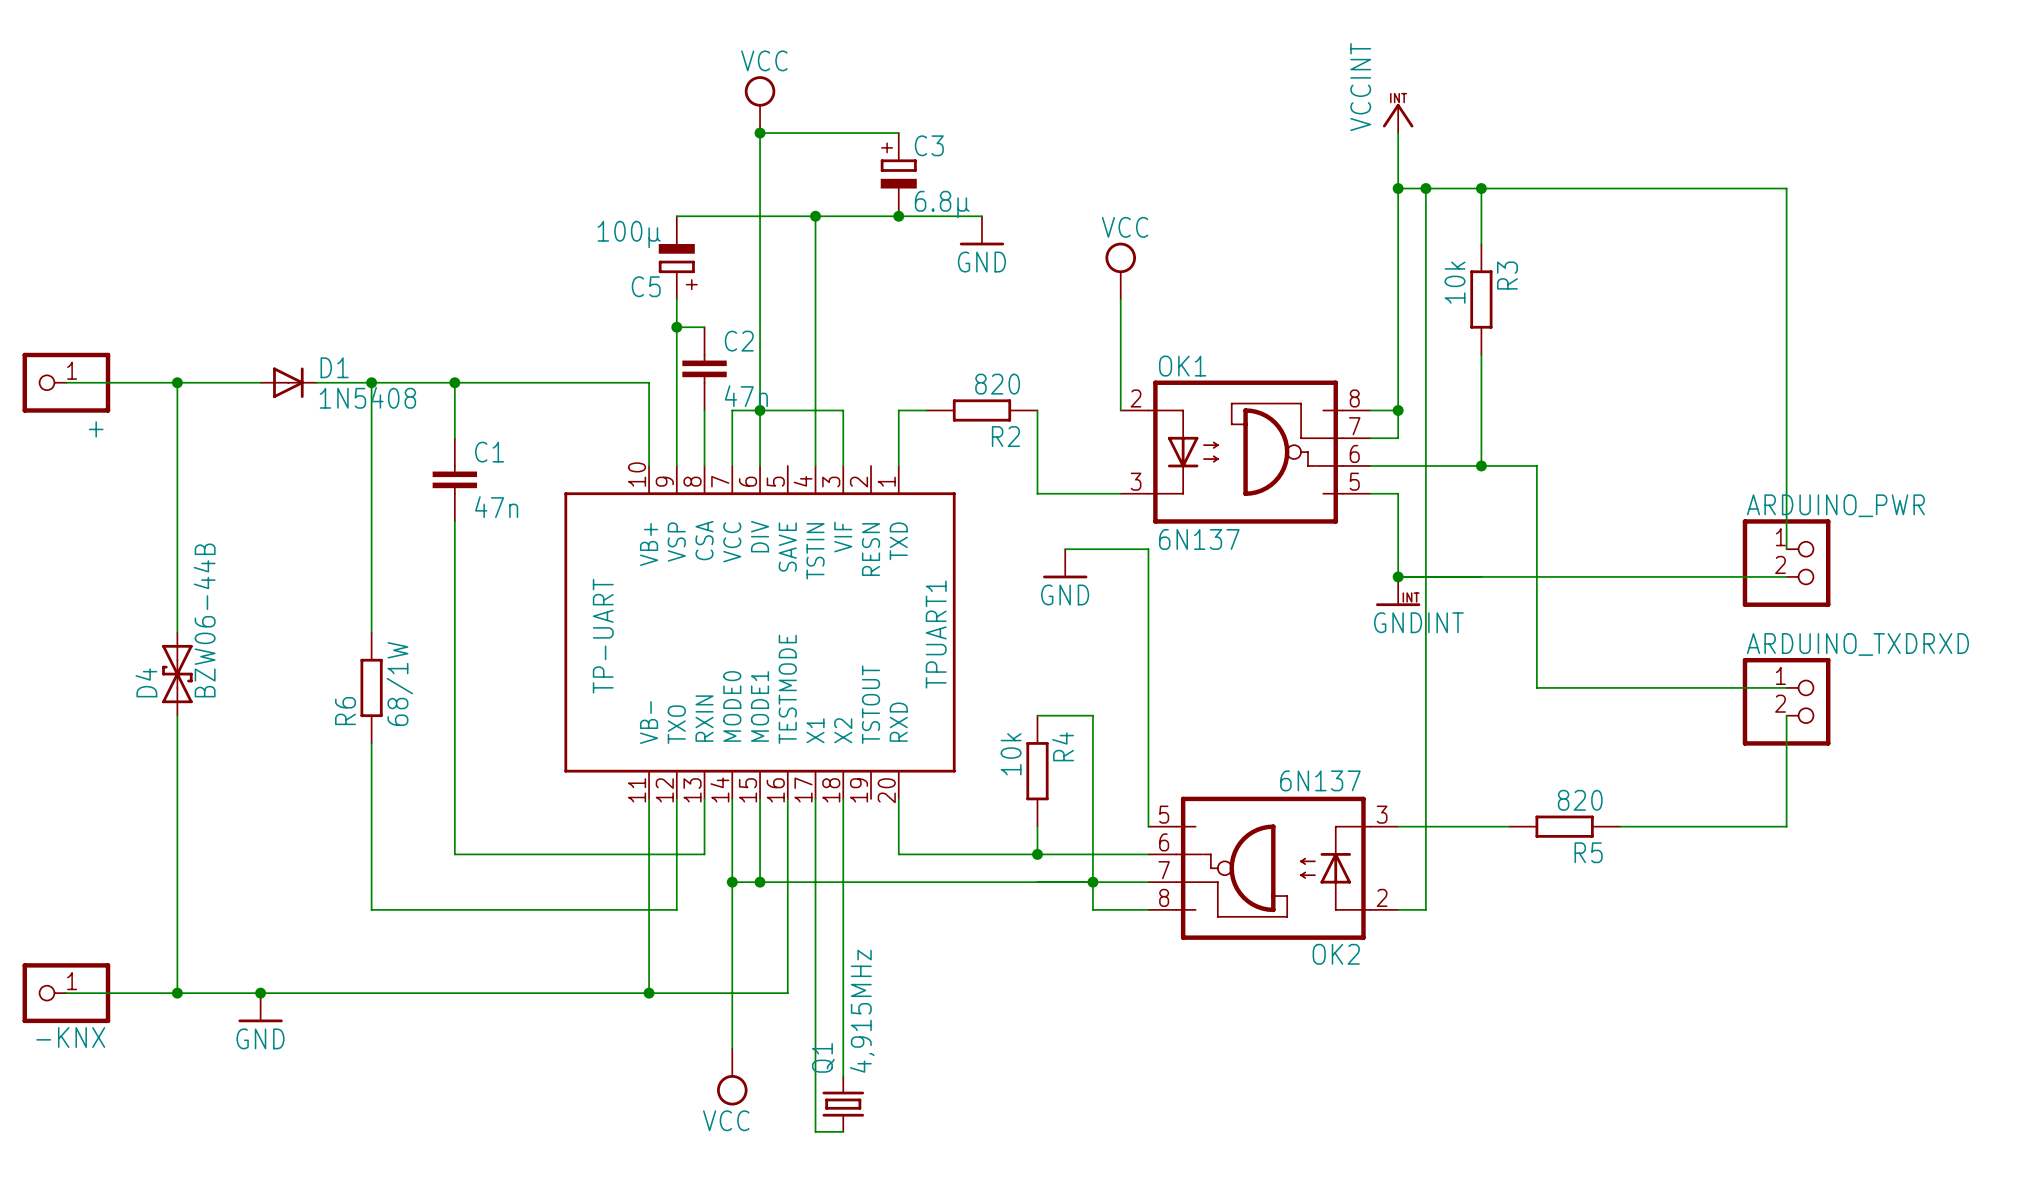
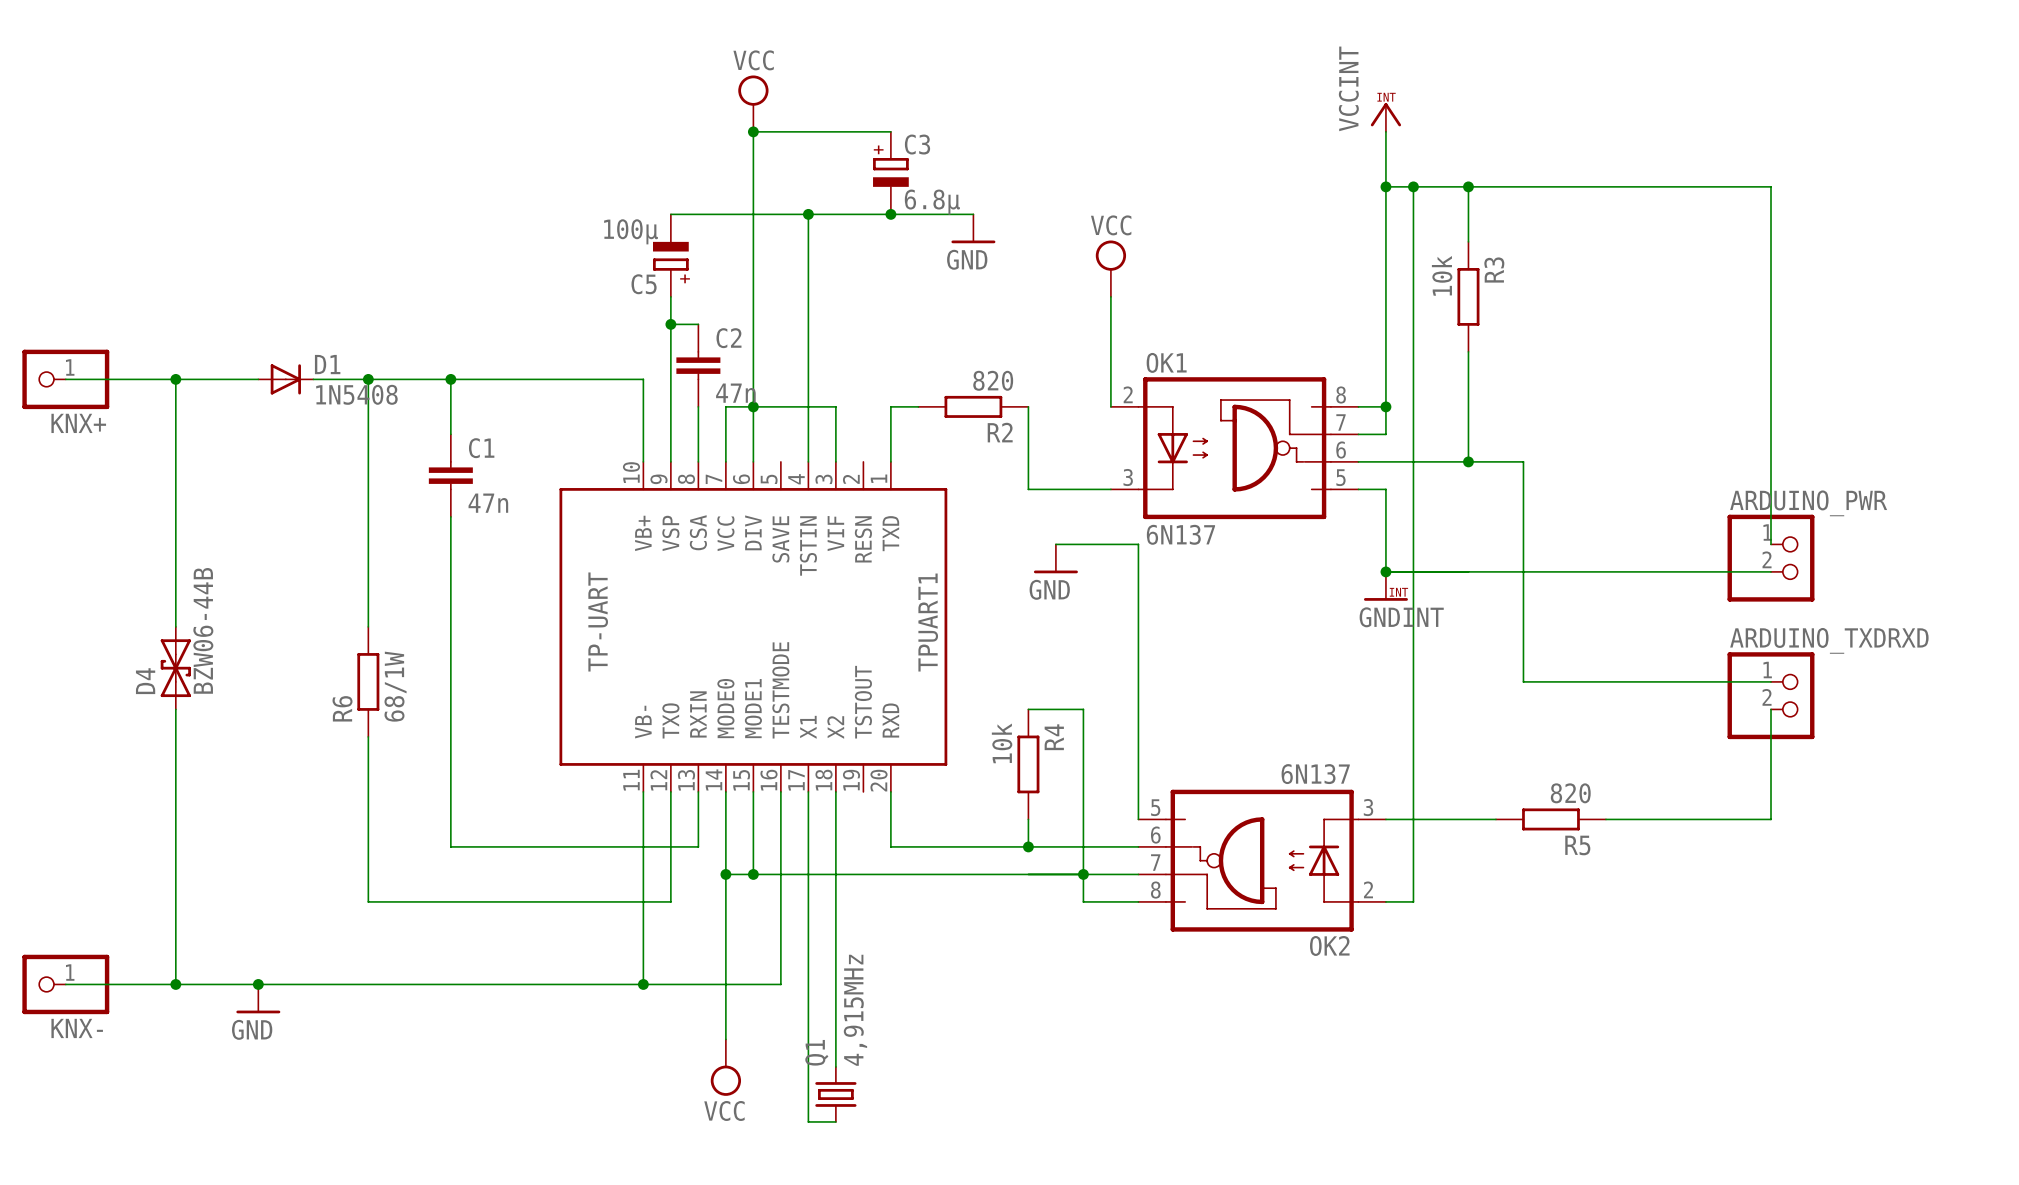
KNX+ name: + (96, 429) -> KNX+ (78, 423)
-KNX name: -KNX (70, 1037) -> KNX- (77, 1028)

